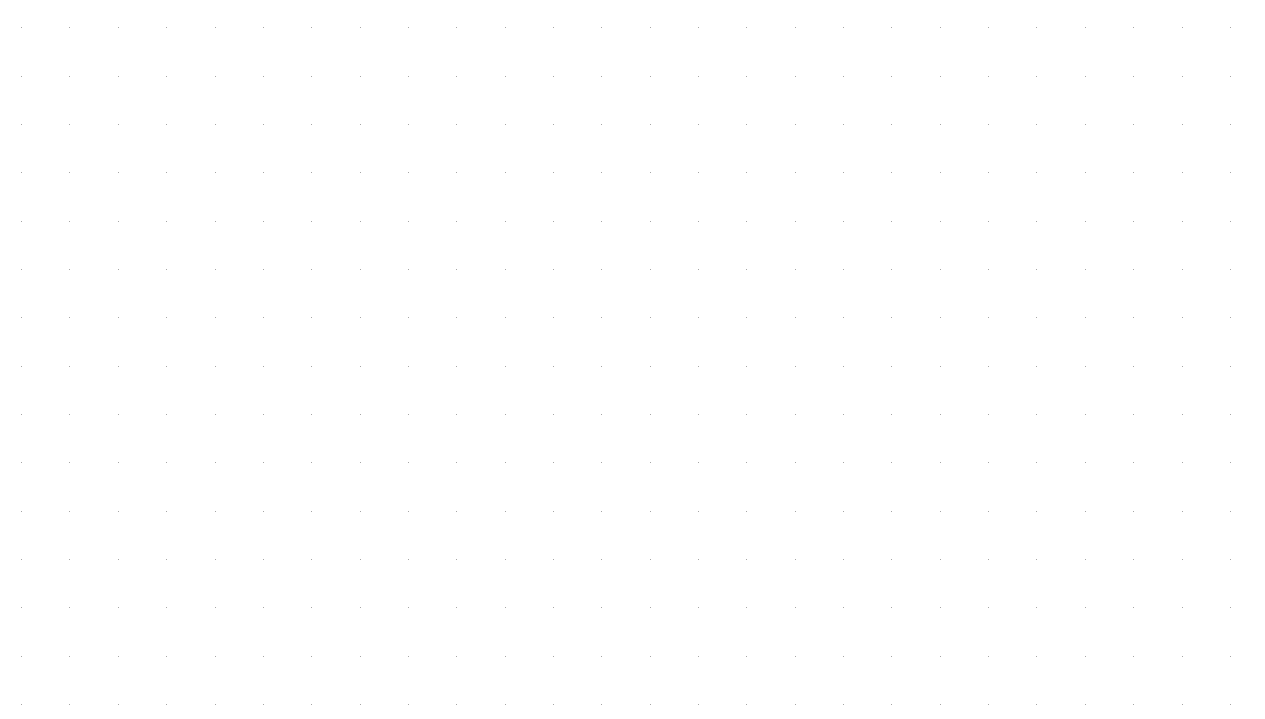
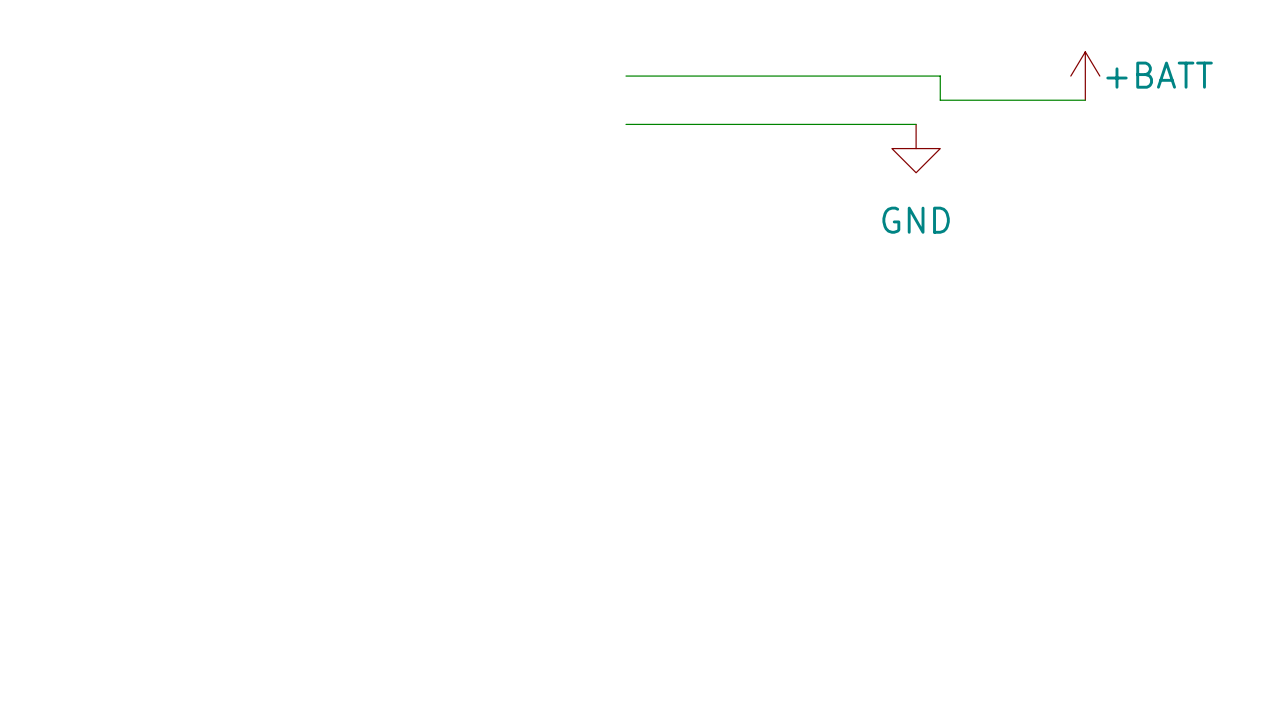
wire: none -> (626, 76) (940, 76) (940, 100) (1085, 100)
power symbol: none -> +BATT (1085, 76)
wire: none -> (626, 124) (916, 124)
power symbol: none -> GND (916, 148)

